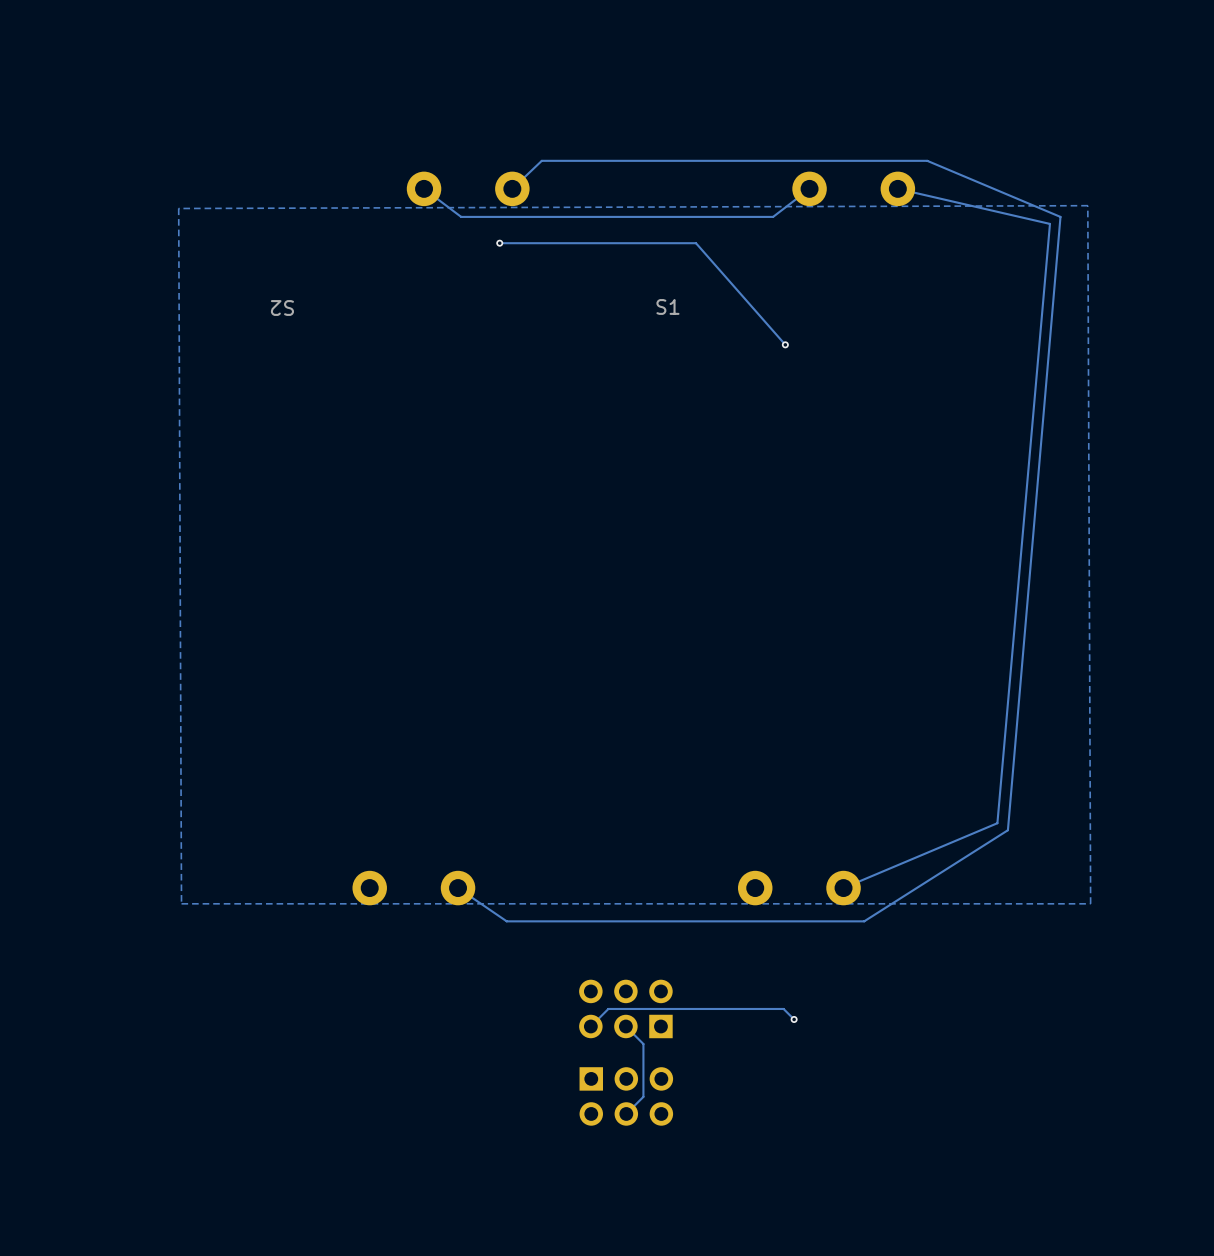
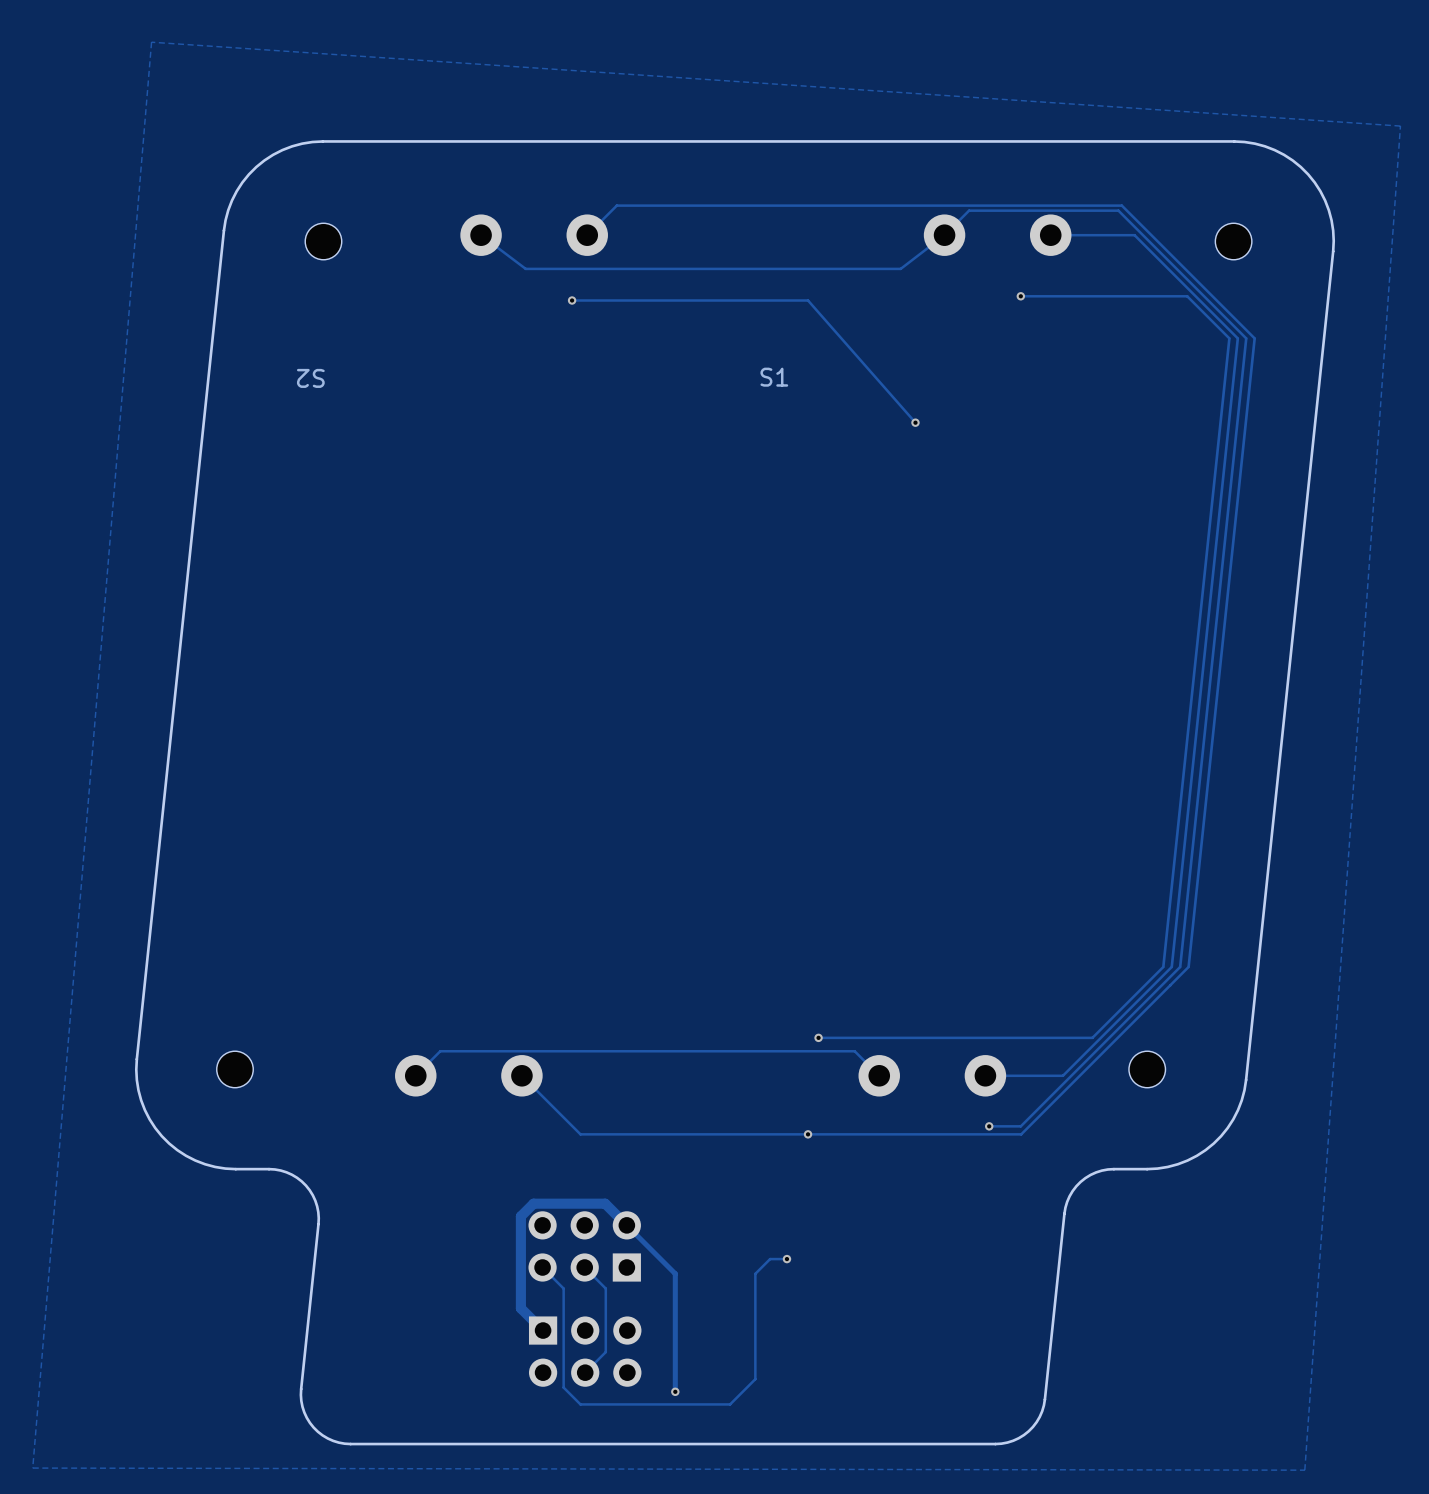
zone outline: none -> (151, 42) (1400, 126) (1304, 1470) (32, 1468) (151, 42)
board edge: none -> (1234, 141) (322, 141) (292, 146) (273, 154) (256, 167) (242, 182) (231, 200) (223, 230) (136, 1059) (136, 1080) (141, 1100) (149, 1119) (161, 1136) (177, 1150) (195, 1160) (215, 1166) (274, 1169) (286, 1172) (301, 1181) (312, 1195) (318, 1212) (318, 1224) (300, 1395) (306, 1417) (322, 1435) (333, 1440) (350, 1444) (995, 1444) (1018, 1438) (1036, 1422) (1044, 1399) (1064, 1213) (1072, 1191) (1085, 1178) (1101, 1170) (1157, 1168) (1177, 1164) (1196, 1155) (1221, 1136) (1233, 1119) (1241, 1100) (1246, 1080) (1333, 240) (1331, 220) (1325, 200) (1314, 182) (1300, 167) (1283, 154) (1264, 146) (1234, 141)
track: (512, 188) (541, 160) (927, 160) (1060, 216) (1007, 830) (864, 921) (506, 921) (458, 888) -> (587, 235) (616, 205) (1121, 205) (1254, 338) (1188, 966) (1021, 1134) (580, 1134) (521, 1075)
track: none -> (944, 235) (969, 210) (1118, 210) (1246, 338) (1180, 966) (1020, 1126) (989, 1126)
track: (897, 188) (1049, 223) (997, 823) (843, 888) -> (1050, 235) (1134, 235) (1237, 338) (1171, 966) (1062, 1075) (985, 1075)
part: none -> (323, 241)
part: none -> (1233, 241)
zone outline: (1087, 205) (178, 208) (181, 903) (1090, 903) (1087, 205) -> none
track: none -> (1020, 296) (1187, 296) (1229, 338) (1163, 966) (1092, 1037) (818, 1037)
via: none -> (1020, 296)
via: none -> (818, 1037)
part: none -> (235, 1069)
part: none -> (1147, 1069)
track: none -> (879, 1075) (854, 1051) (440, 1051) (415, 1075)
via: none -> (989, 1126)
via: none -> (808, 1134)
part: (625, 1008) -> none
track: (794, 1019) (783, 1008) (608, 1008) (590, 1026) -> none
via: (794, 1019) -> none
track: (625, 1026) (643, 1044) (643, 1096) (626, 1113) -> (584, 1267) (605, 1288) (605, 1352) (585, 1372)
part: none -> (584, 1246)
track: none -> (786, 1259) (770, 1259) (755, 1273) (755, 1379) (730, 1404) (580, 1404) (563, 1387) (563, 1288) (542, 1267)
via: none -> (786, 1259)
part: (626, 1096) -> none
track: none -> (543, 1330) (520, 1308) (520, 1216) (533, 1203) (605, 1203) (675, 1273) (675, 1391)
part: none -> (585, 1351)
via: none -> (675, 1391)

